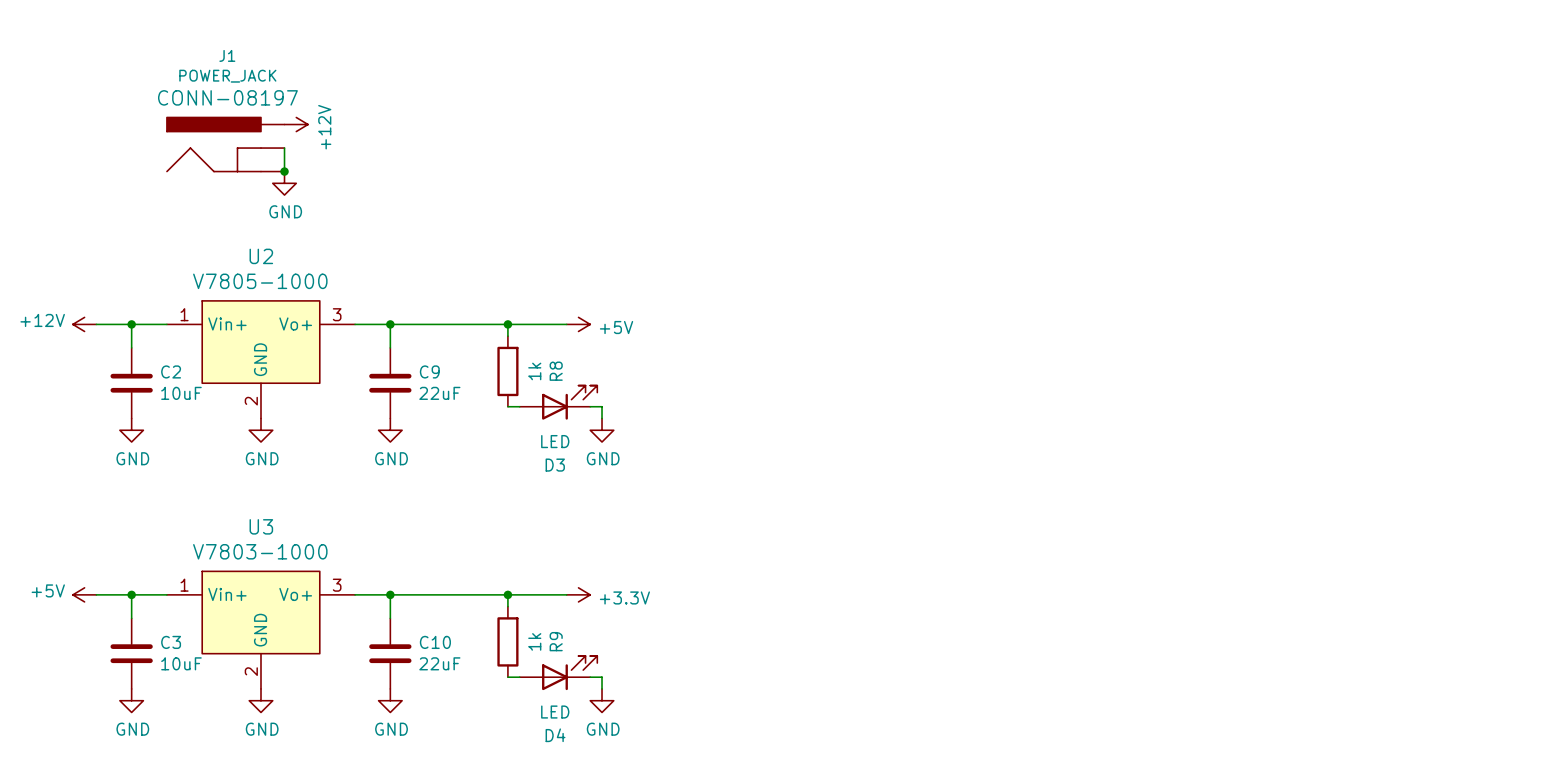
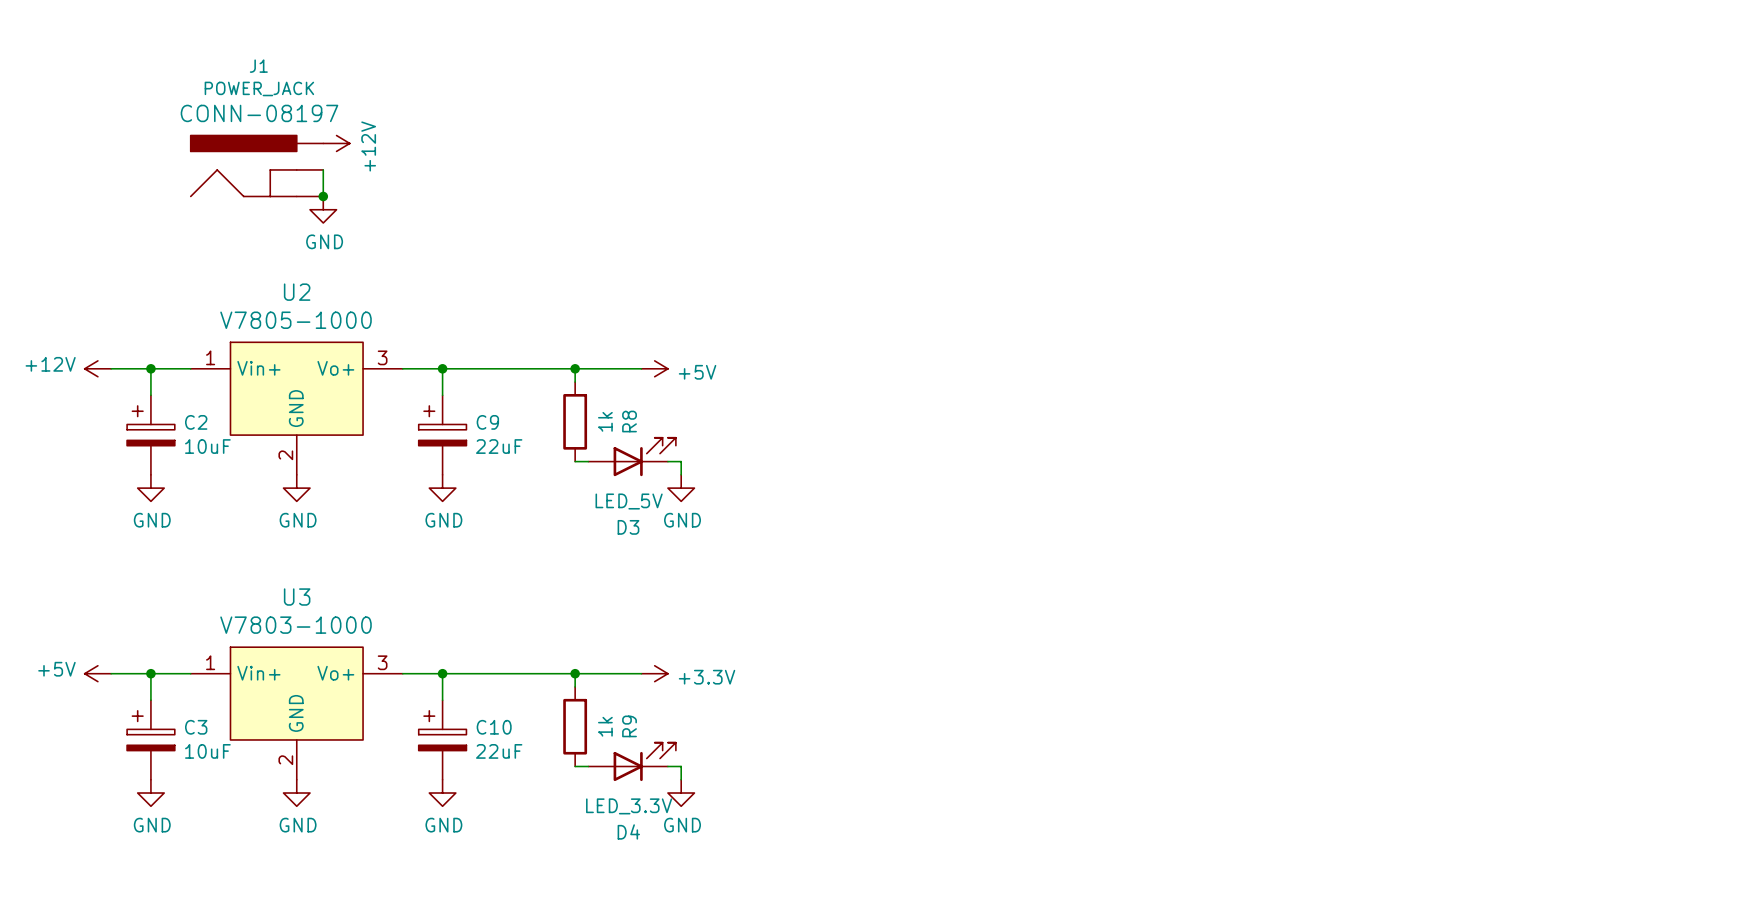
C2 symbol: [110, 347, 153, 419] -> [127, 395, 175, 475]
C9 symbol: [369, 347, 412, 419] -> [418, 395, 467, 475]
D3 value: LED (555, 441) -> LED_5V (629, 501)
C3 symbol: [110, 618, 153, 689] -> [127, 700, 175, 780]
C10 symbol: [369, 618, 412, 689] -> [418, 700, 467, 780]
D4 value: LED (555, 712) -> LED_3.3V (629, 806)

